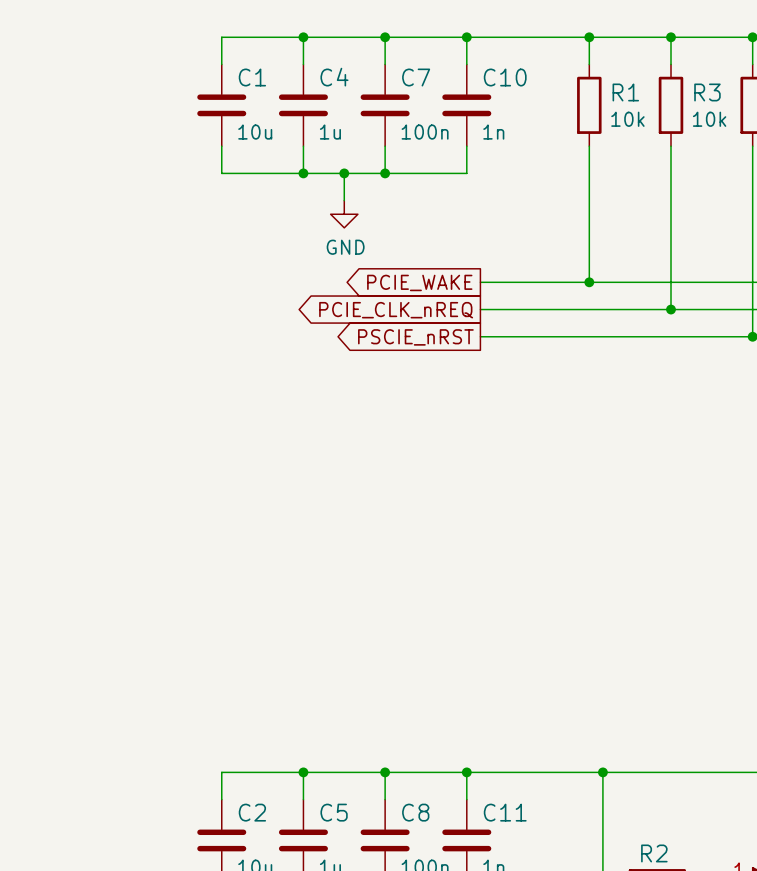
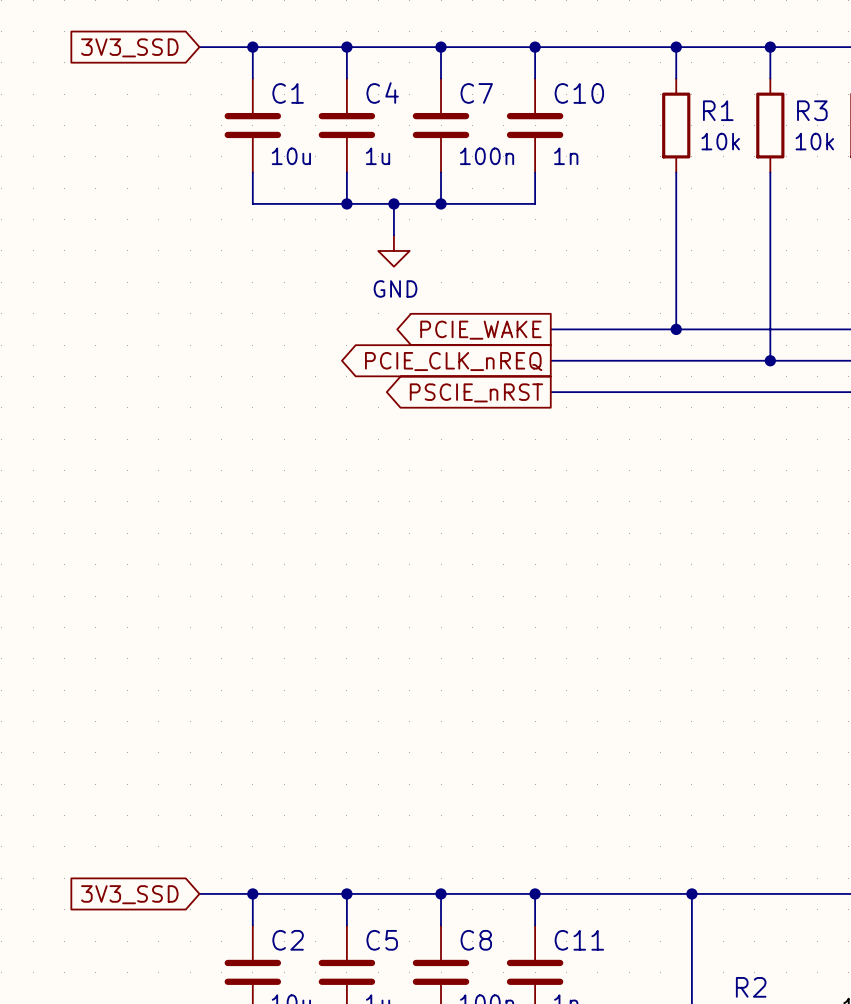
global label: none -> 3V3_SSD (129, 47)
wire: none -> (199, 47) (252, 47)
junction: none -> (252, 47)
wire: none -> (199, 893) (252, 893)
junction: none -> (252, 893)
global label: none -> 3V3_SSD (129, 894)

